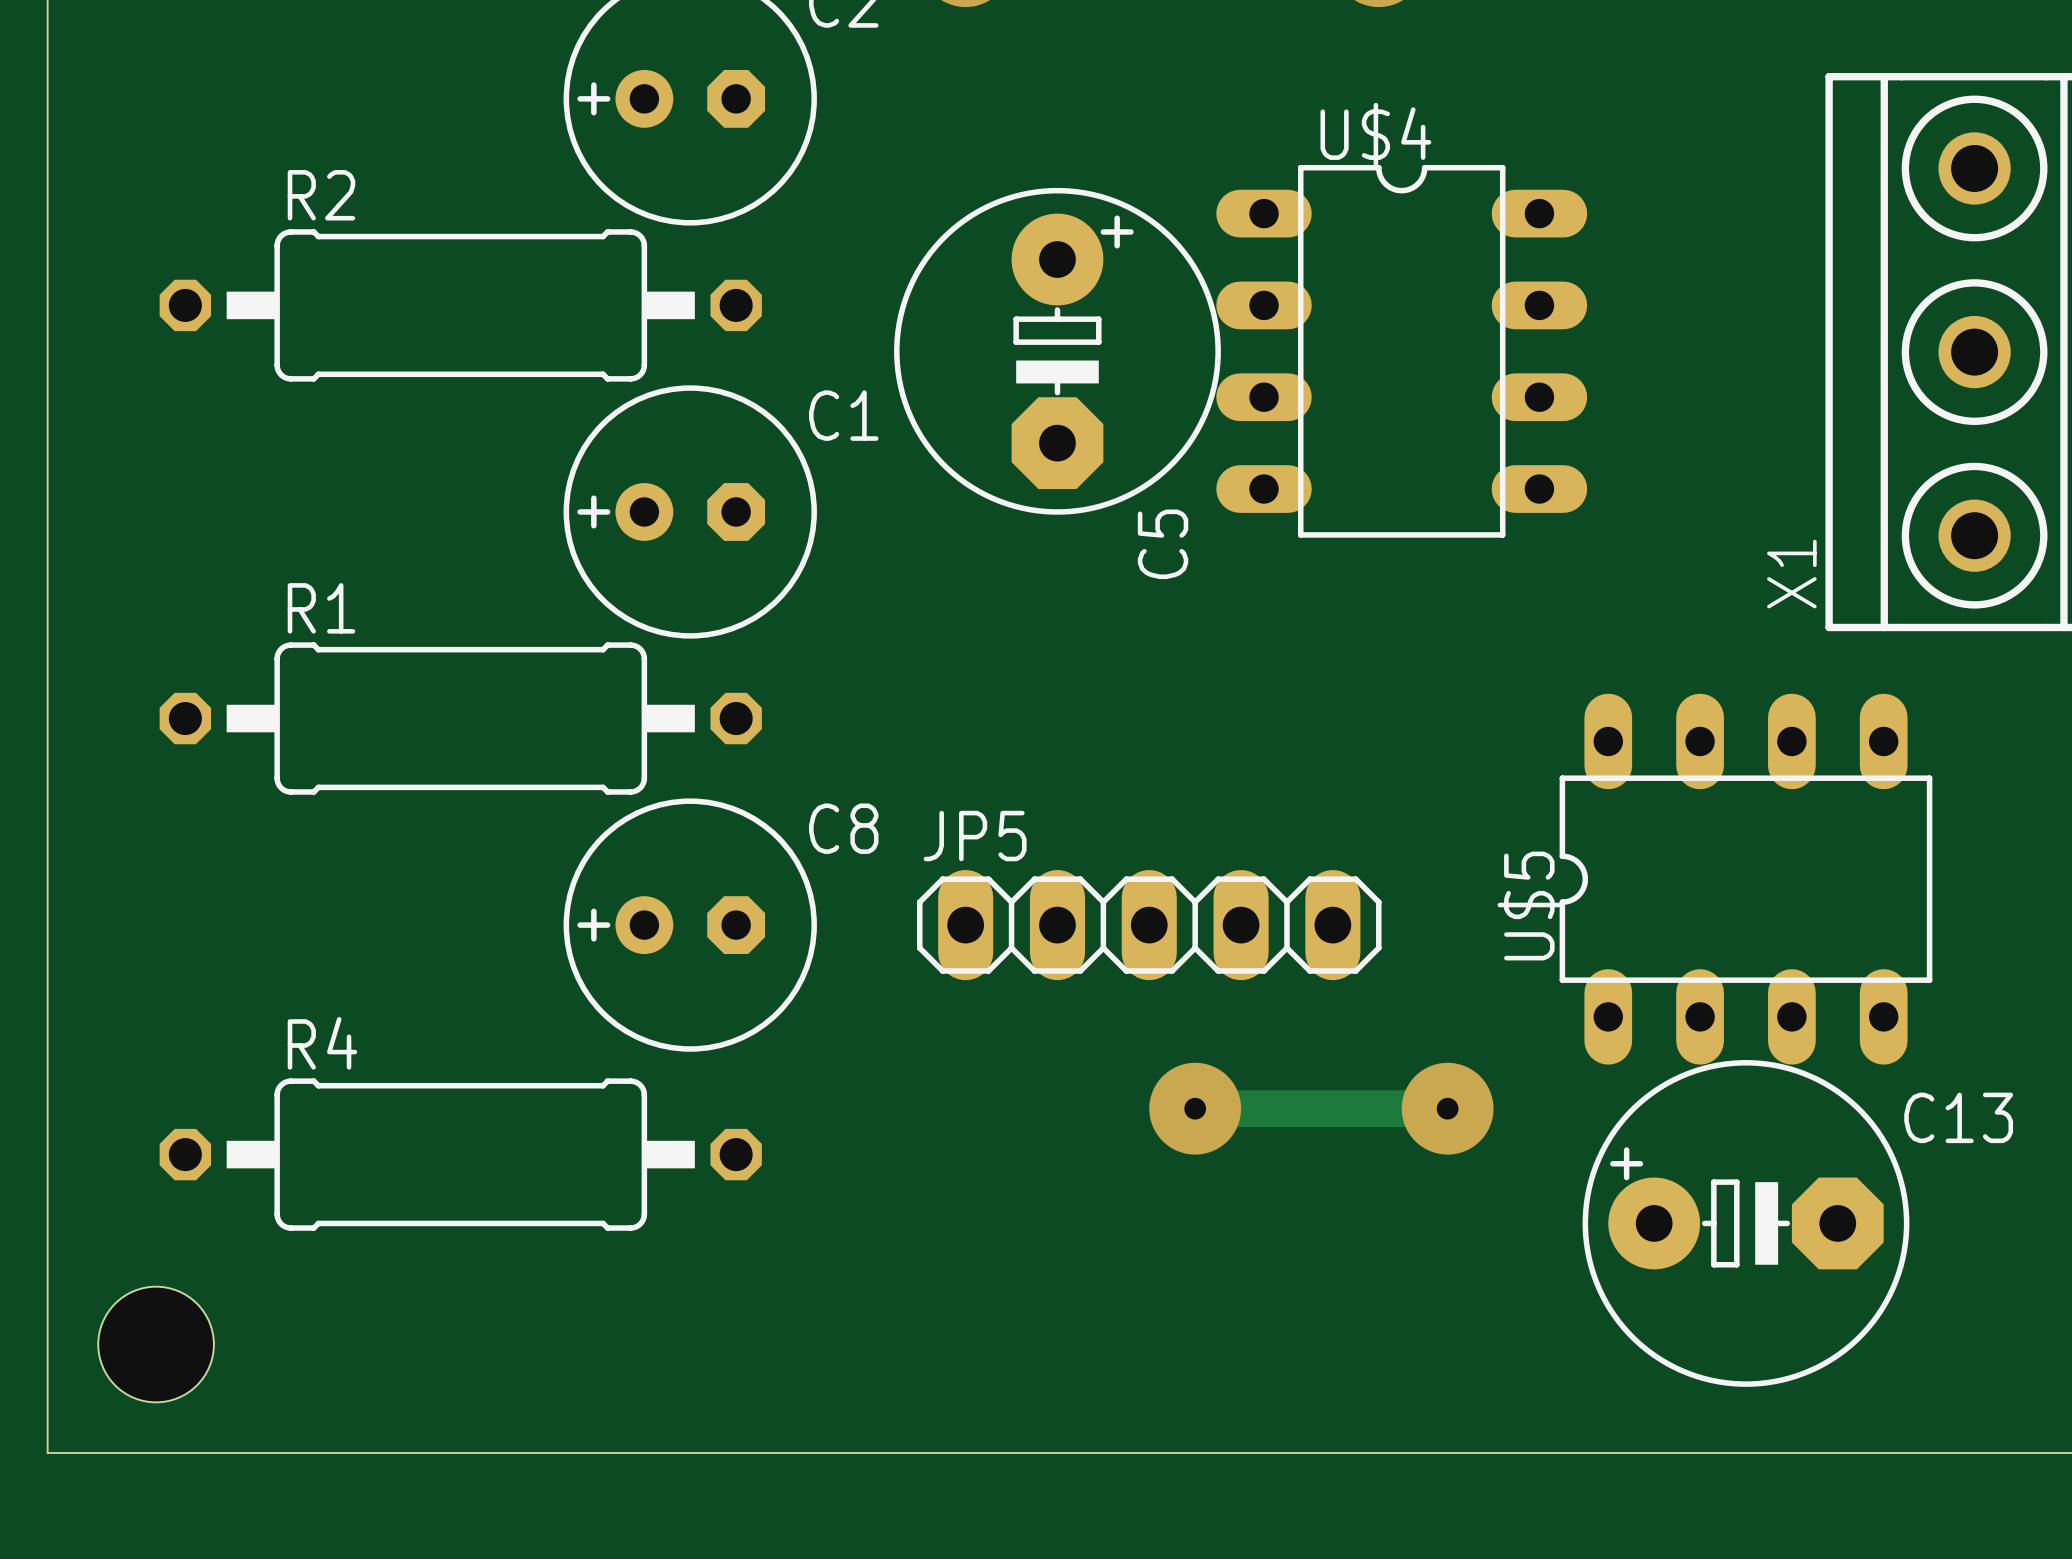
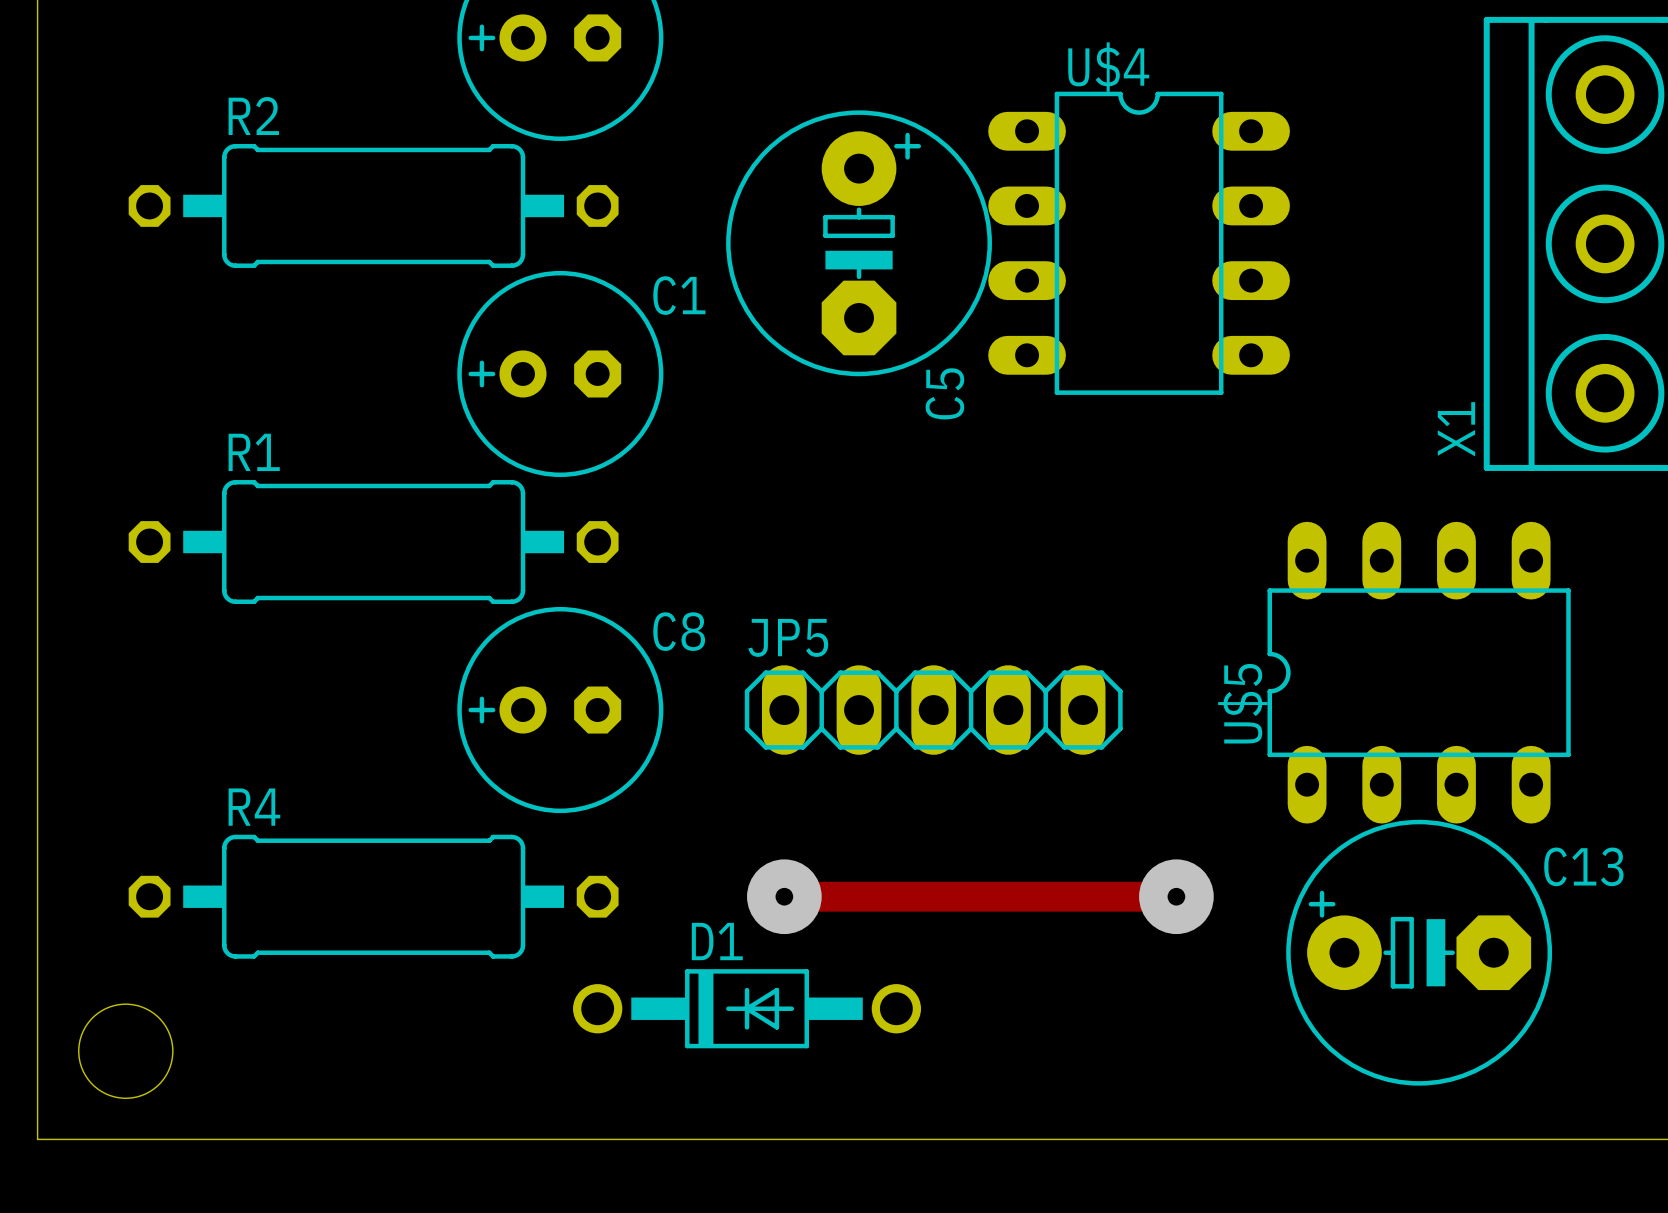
track: (1195, 1108) (1447, 1108) -> none
via: (1195, 1108) -> none
via position: (1447, 1108) -> (1176, 896)
track: none -> (784, 896) (1176, 896)
via: none -> (784, 896)
D1: none -> (747, 1008)

